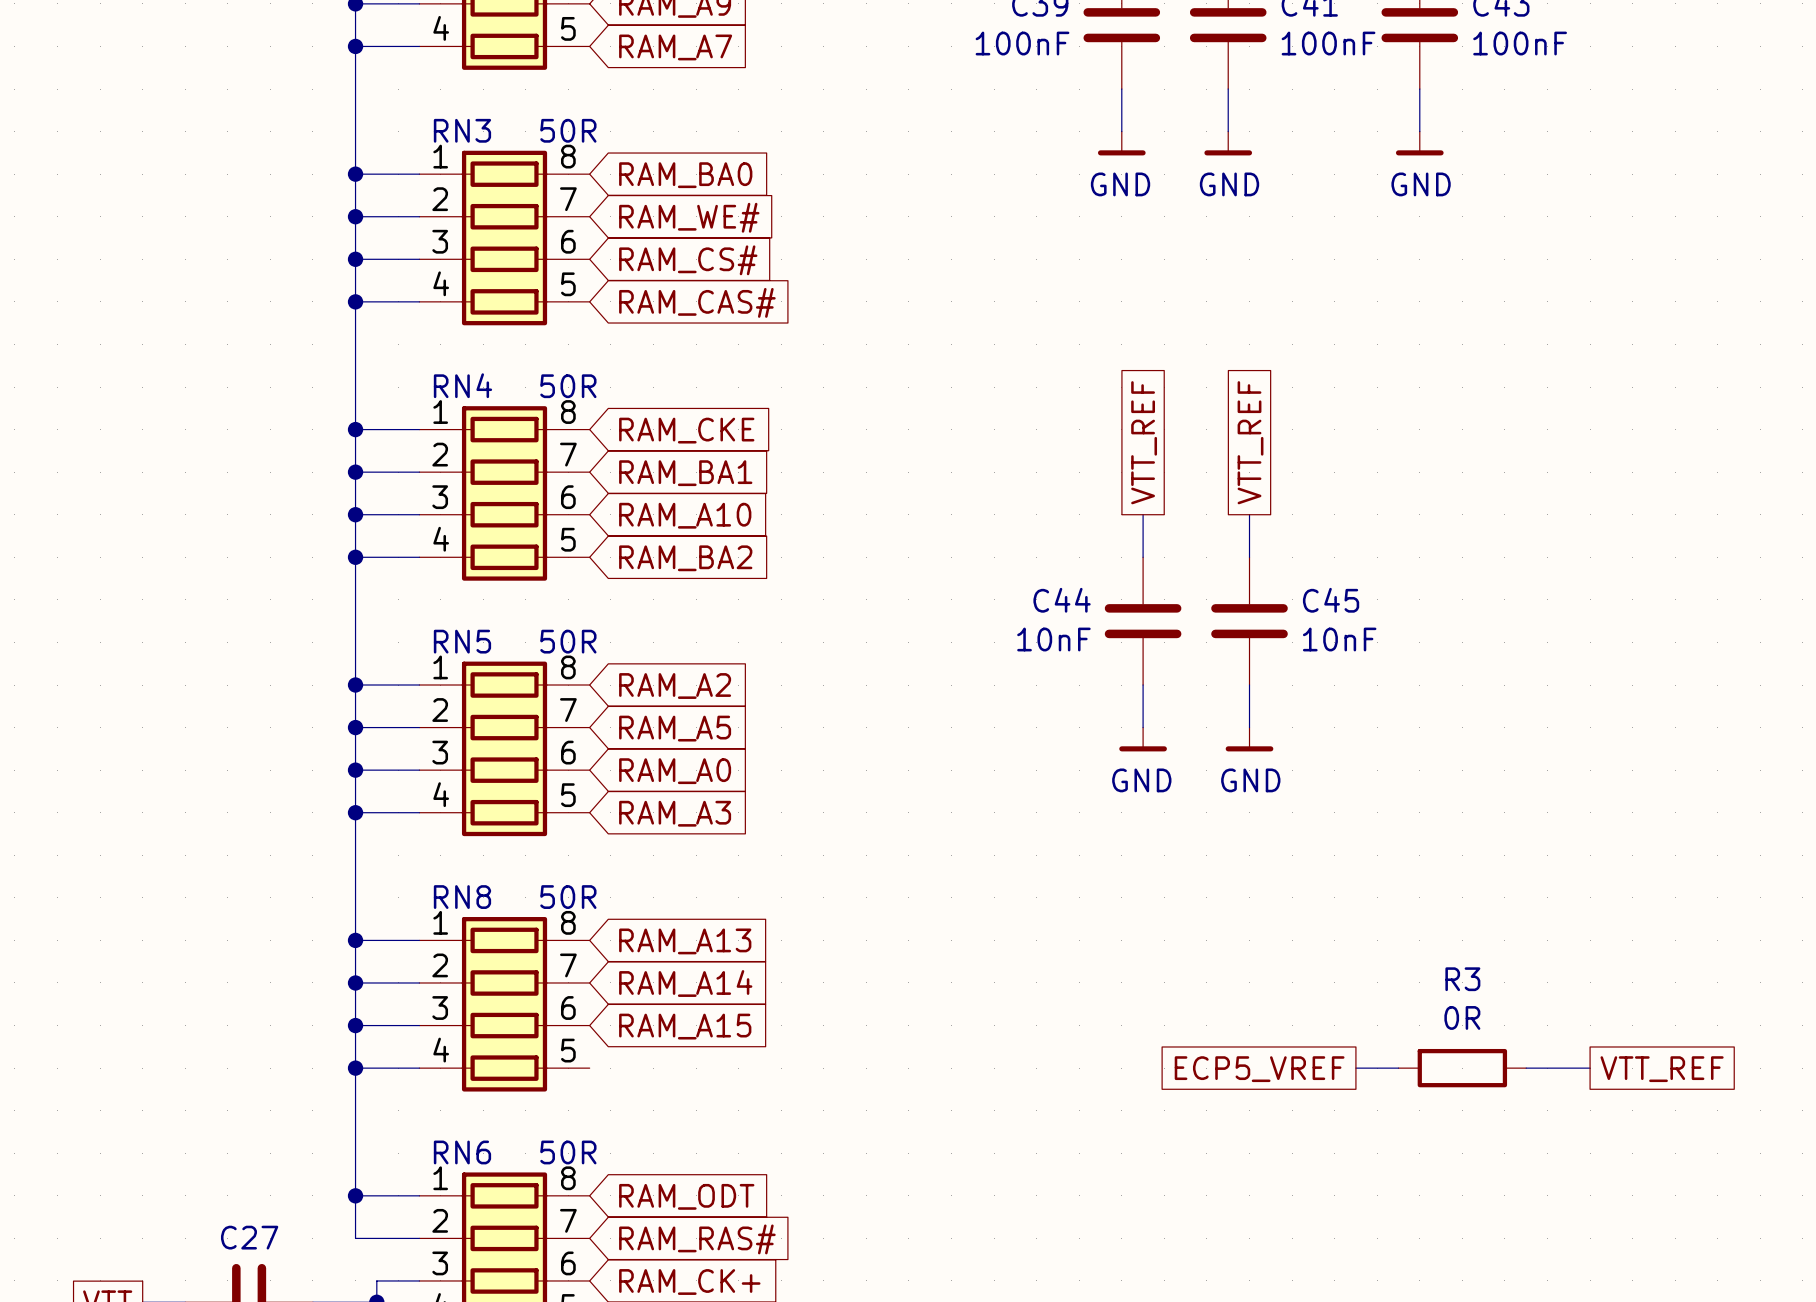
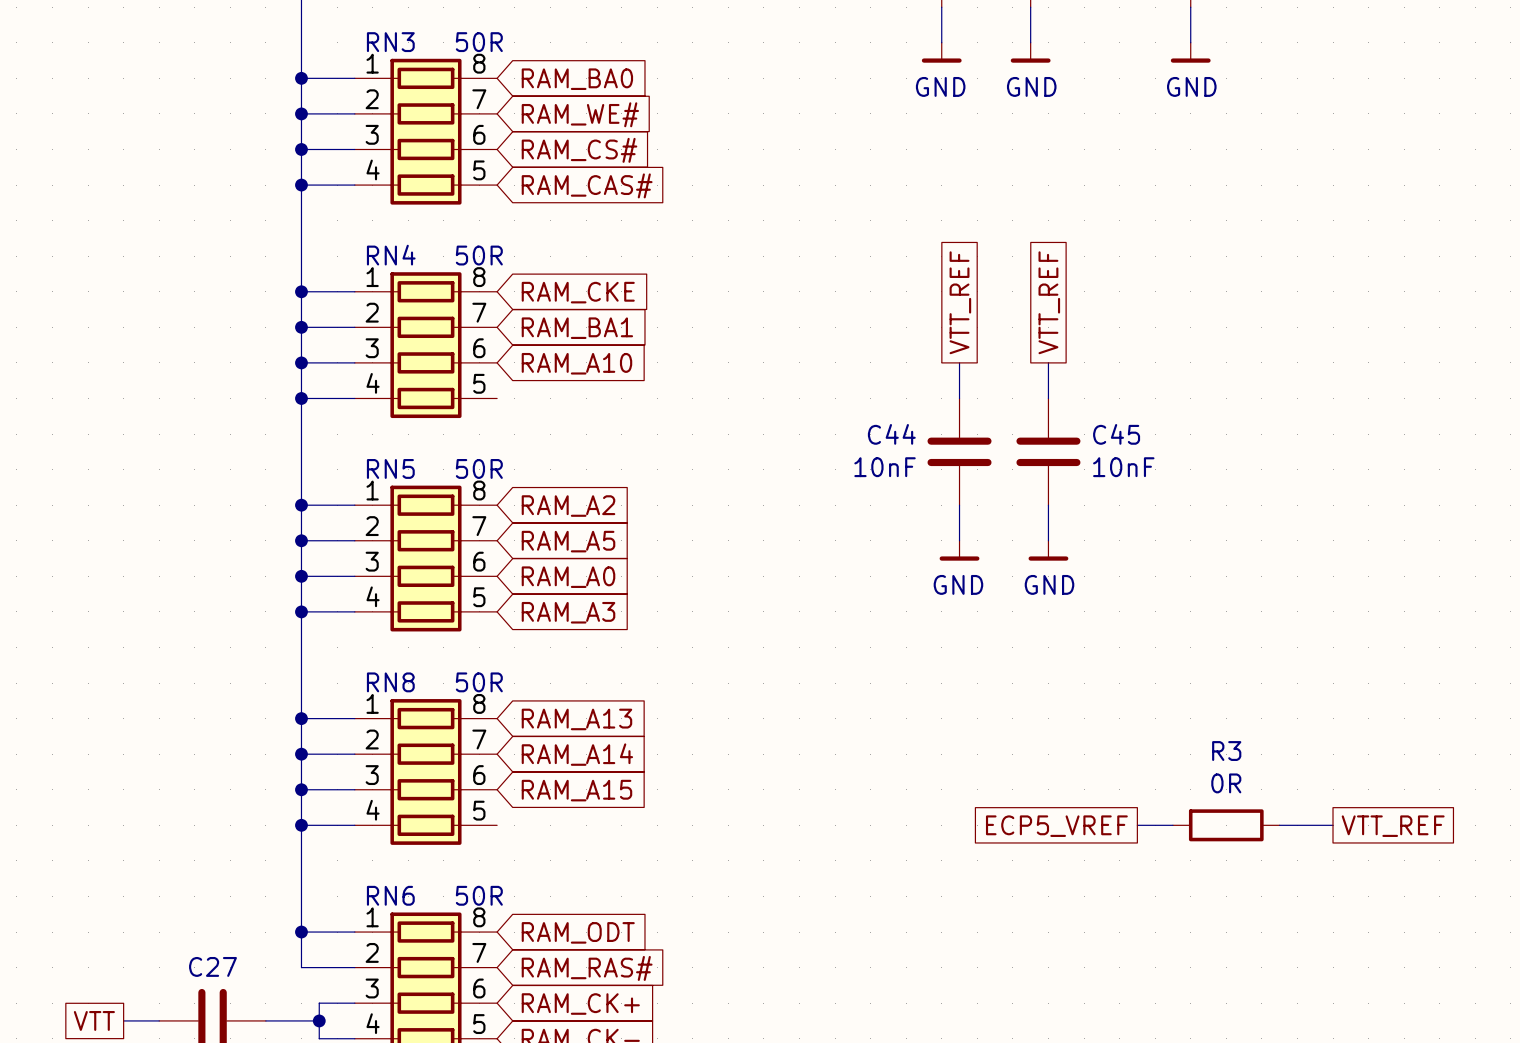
global label: RAM_BA2 (685, 558) -> none

